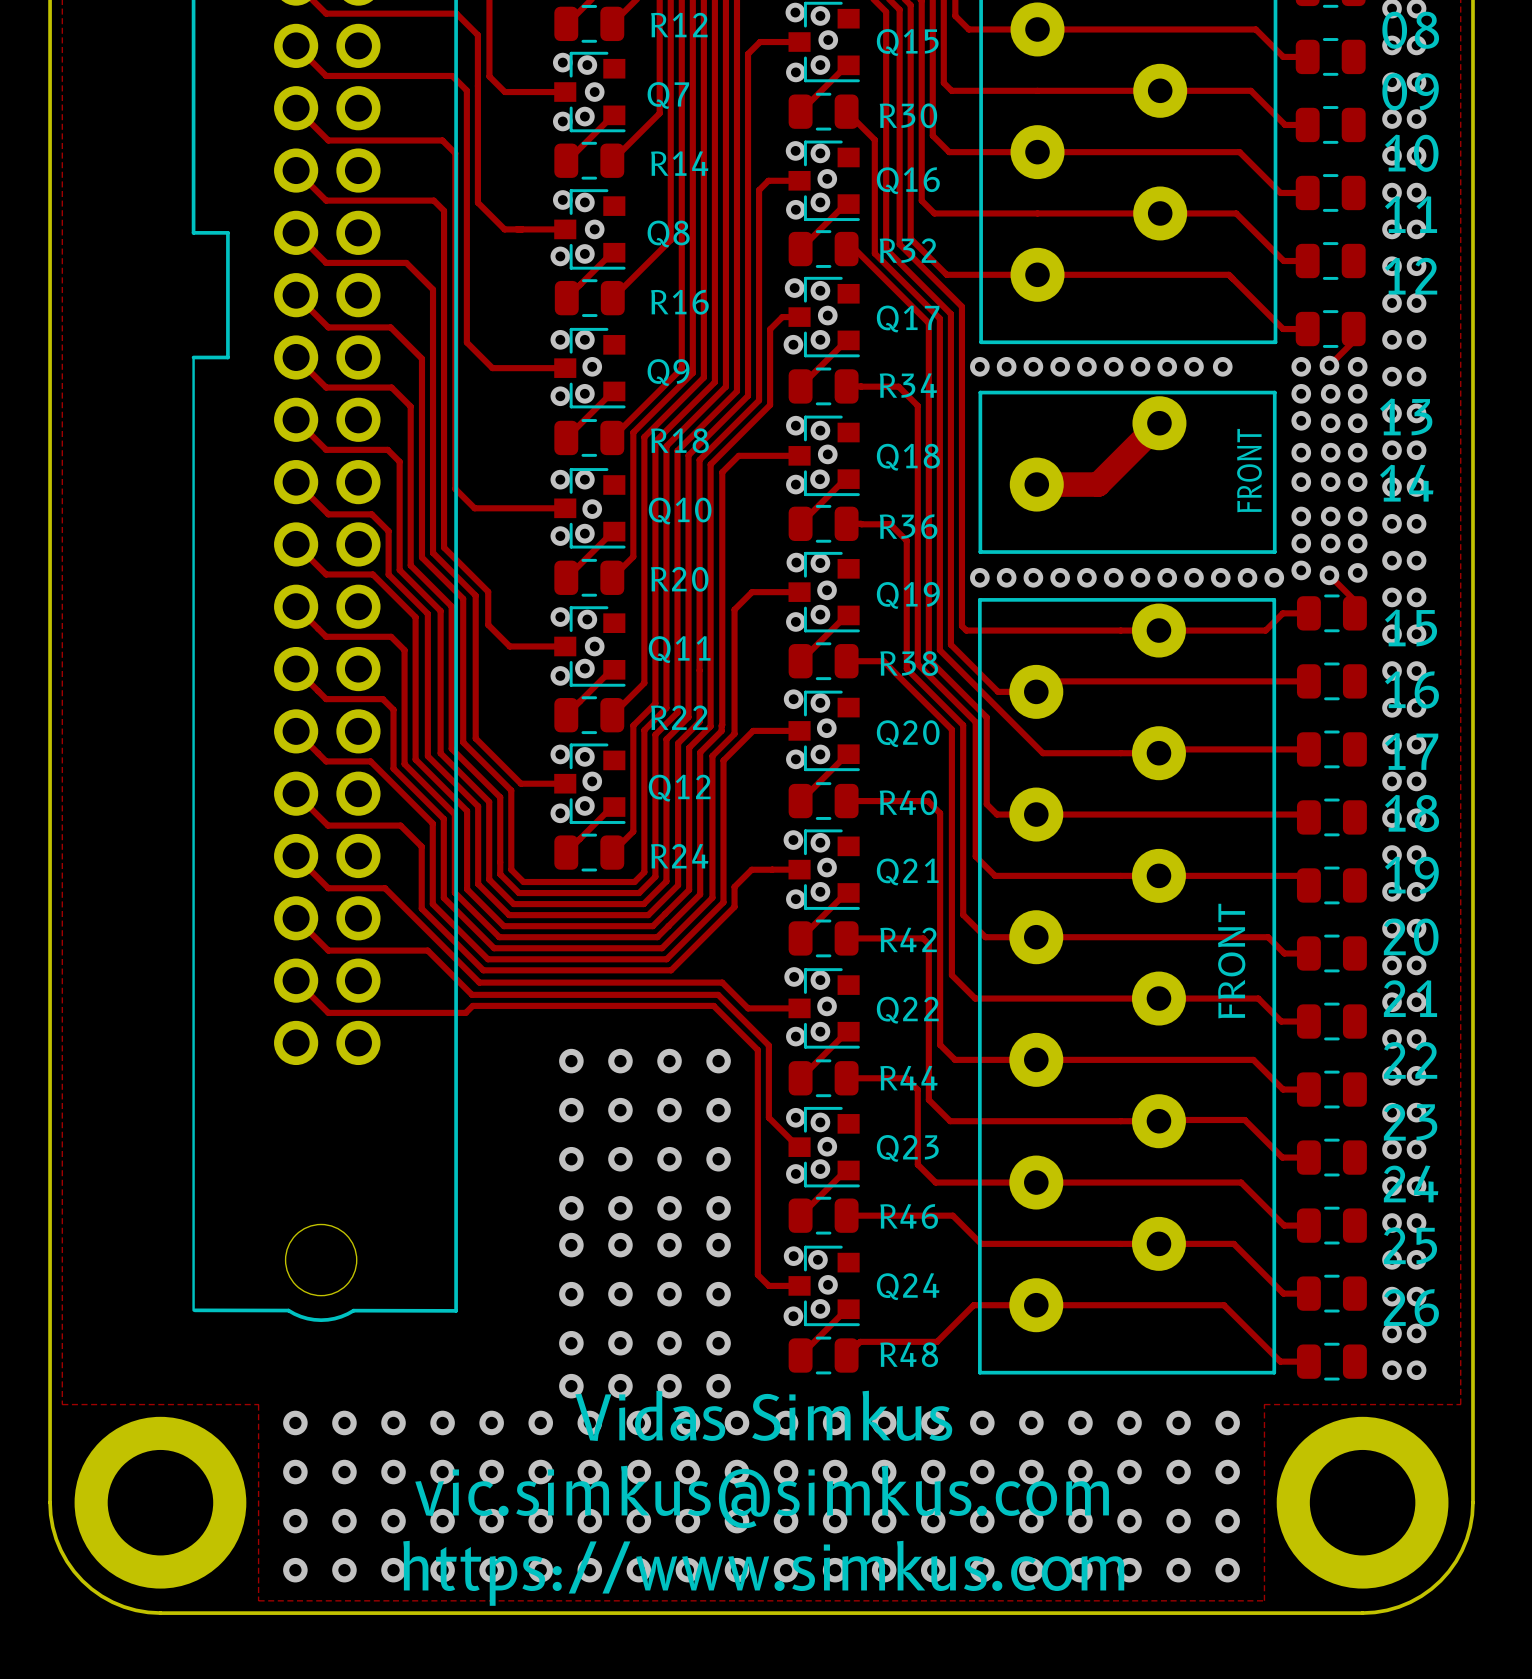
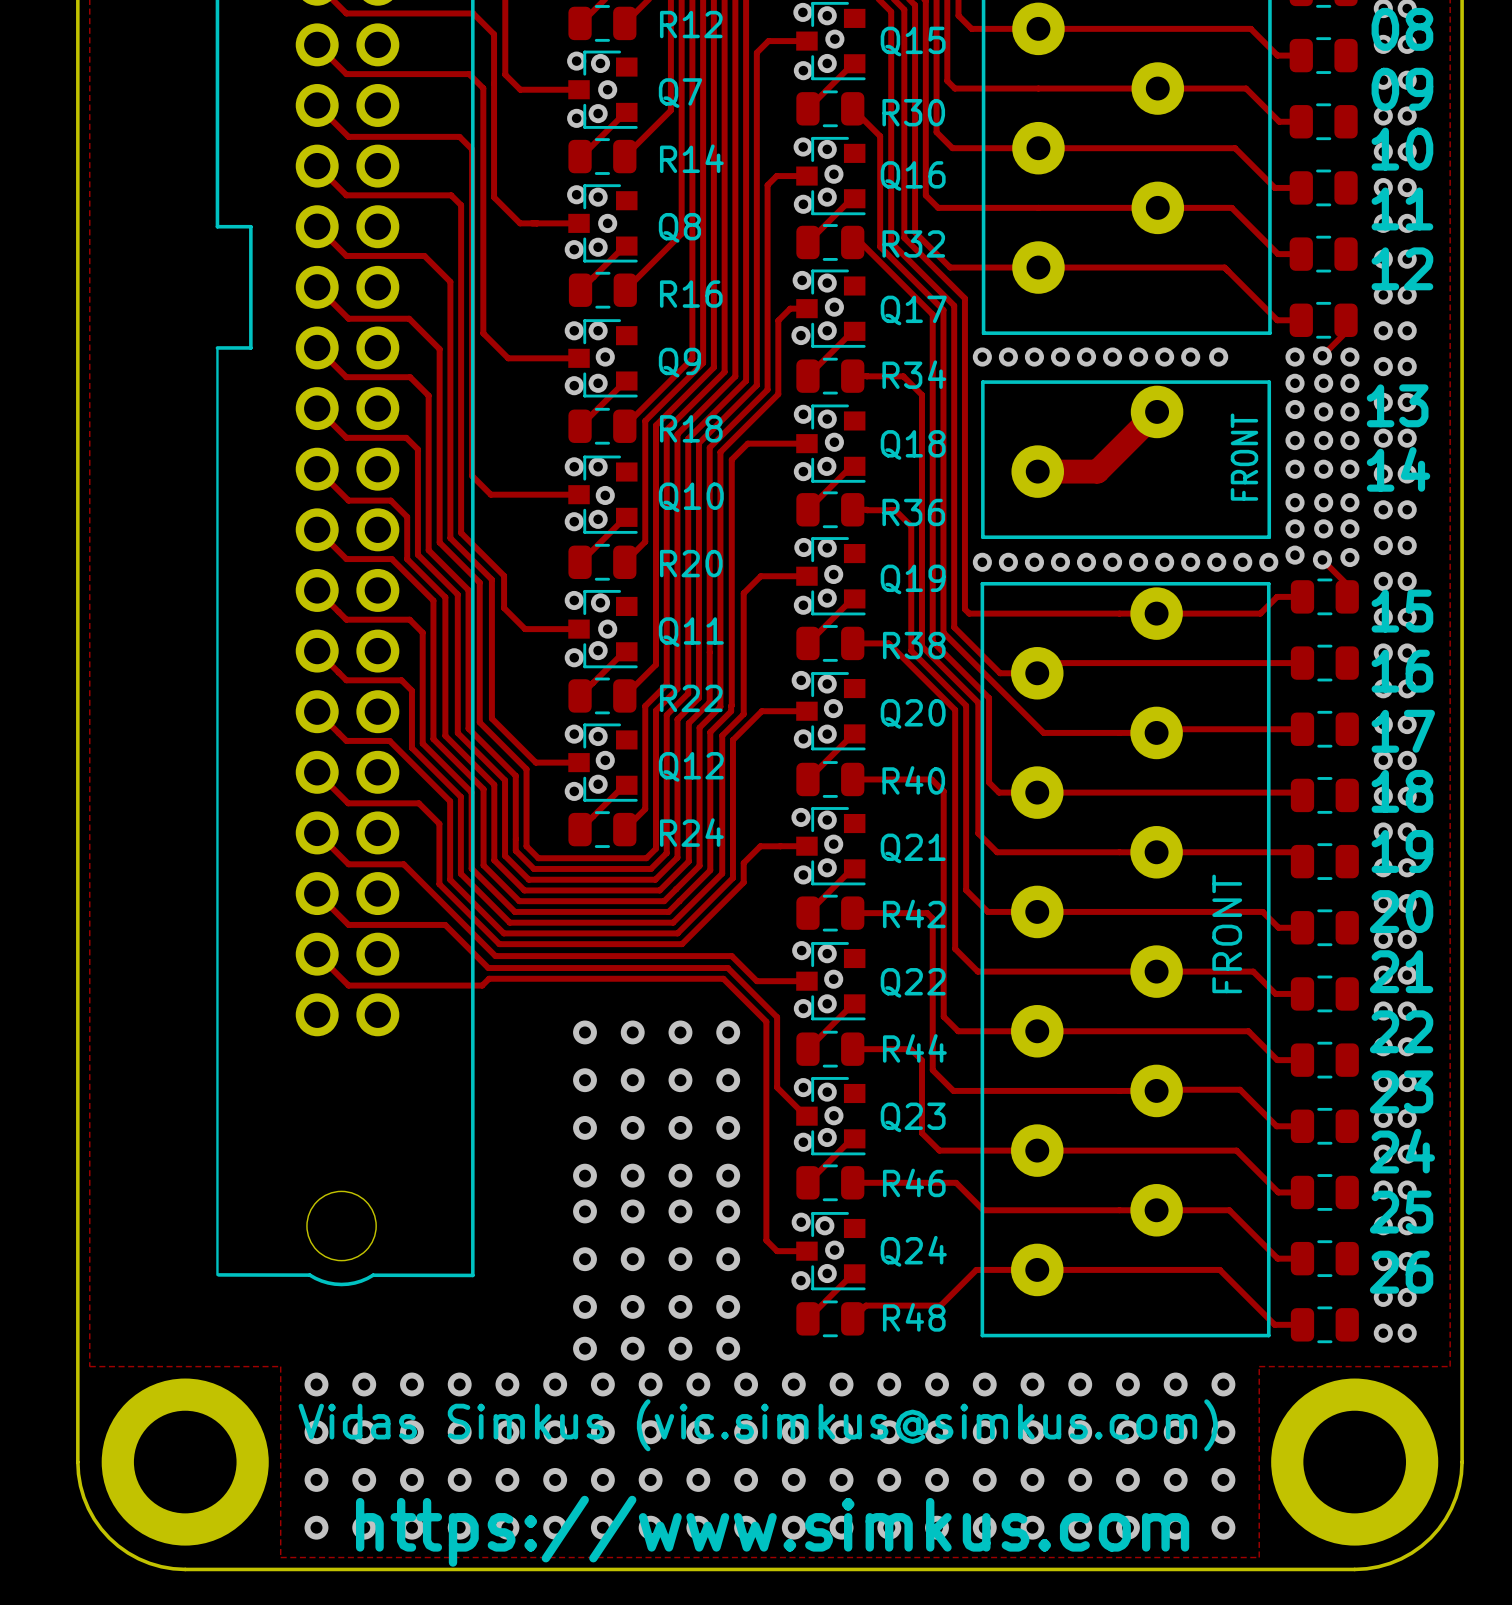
text: Vidas Simkus (763, 1415) -> none
text: vic.simkus@simkus.com (762, 1496) -> Vidas Simkus (vic.simkus@simkus.com) (758, 1425)

